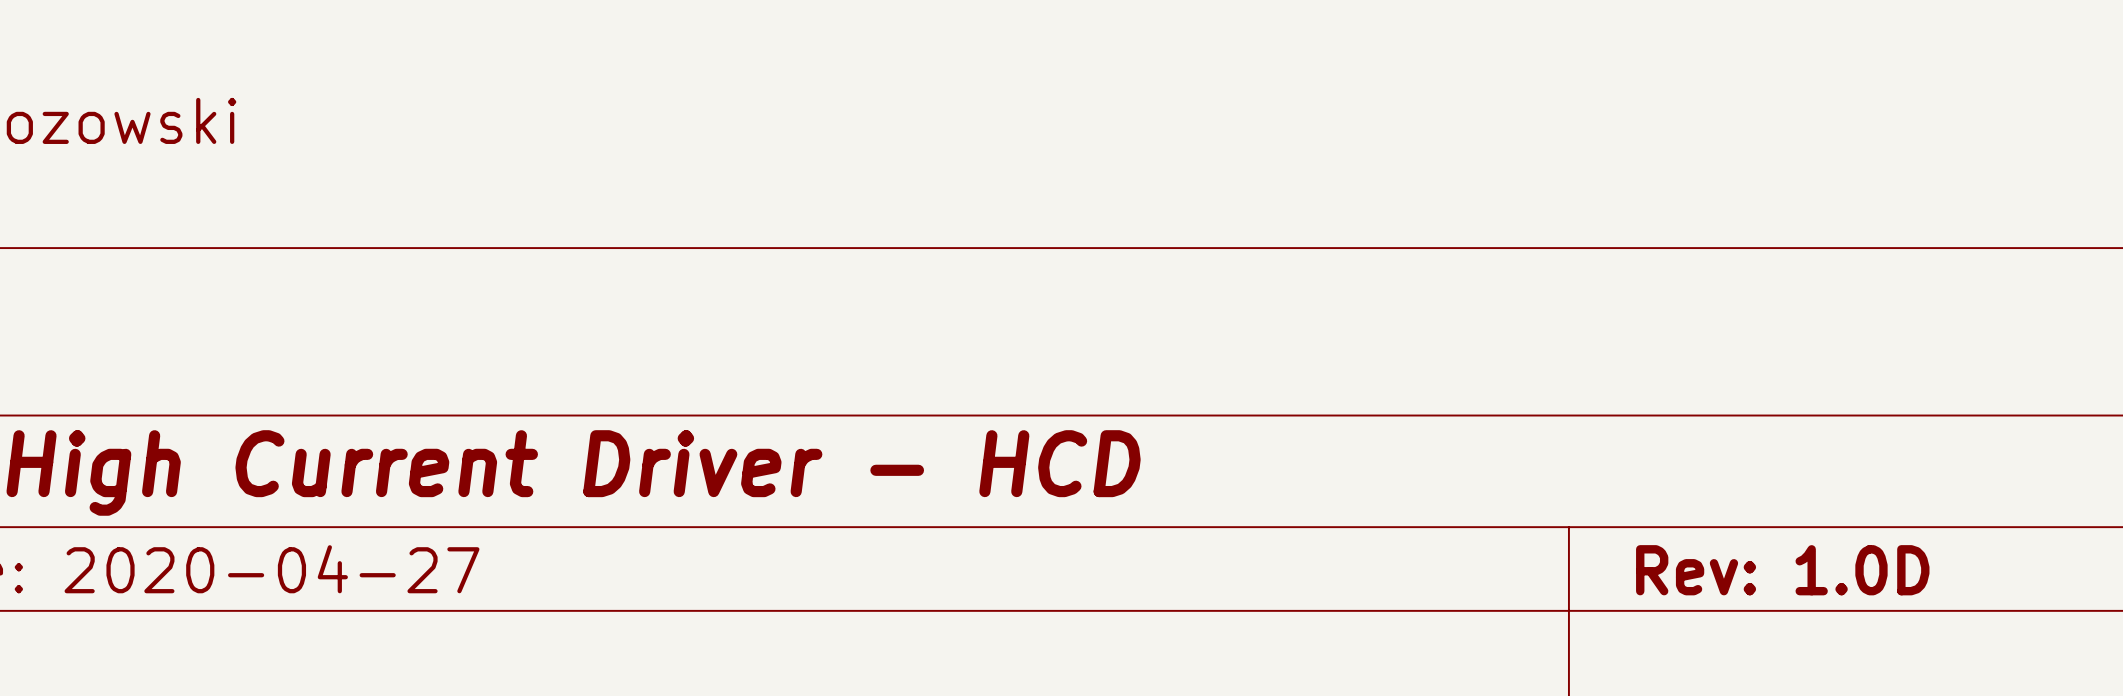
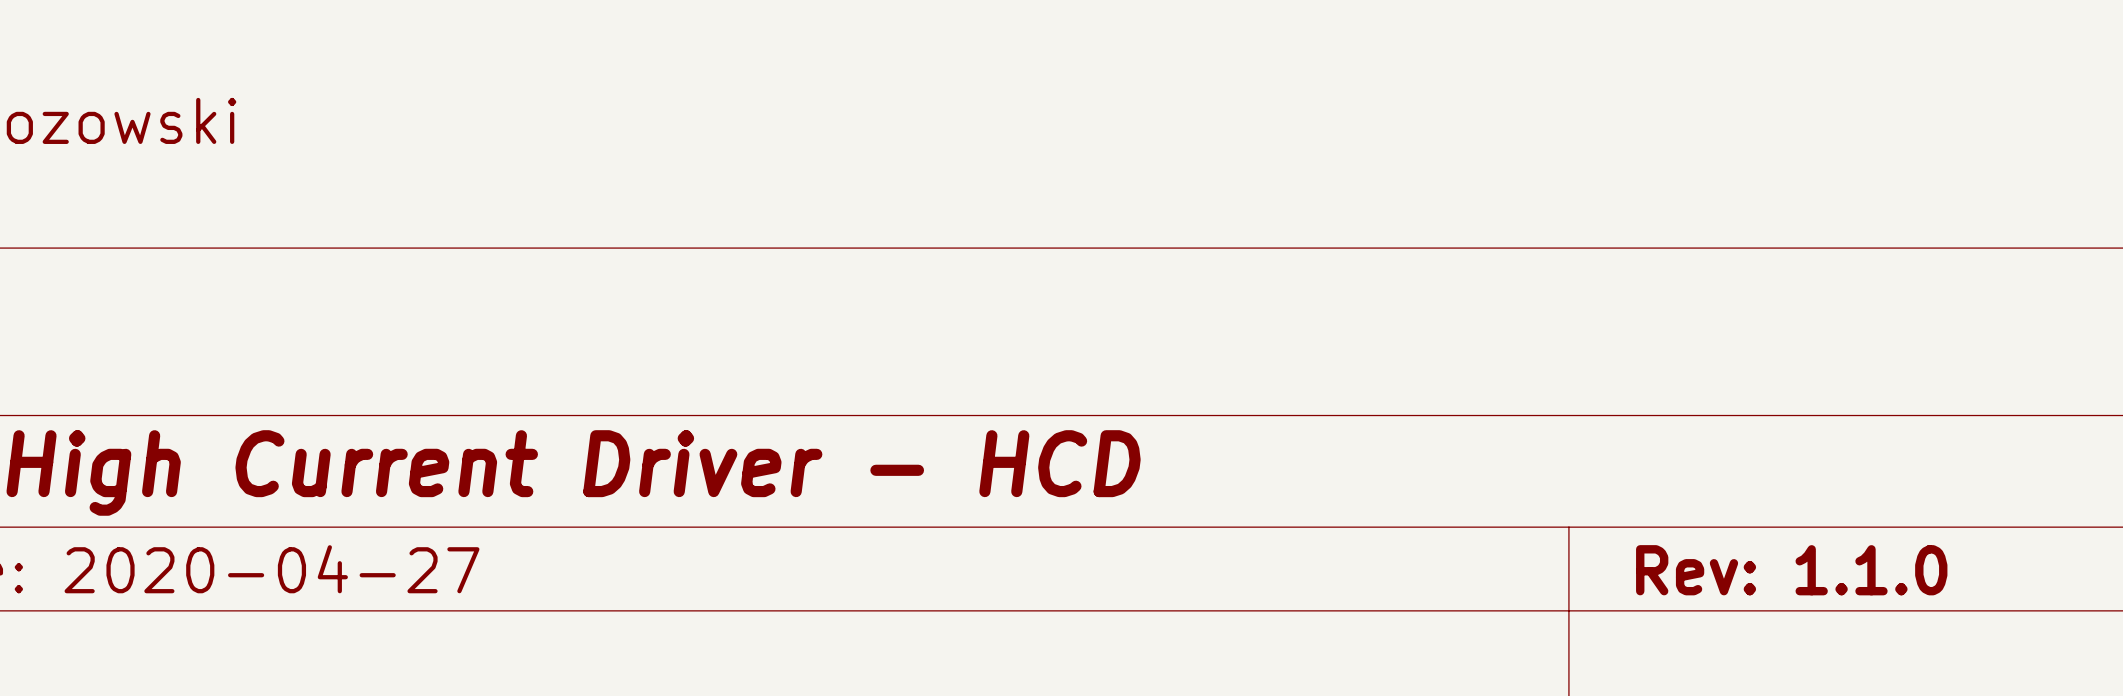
title block: Rev: 1.0D (1782, 570) -> Rev: 1.1.0 (1791, 570)

